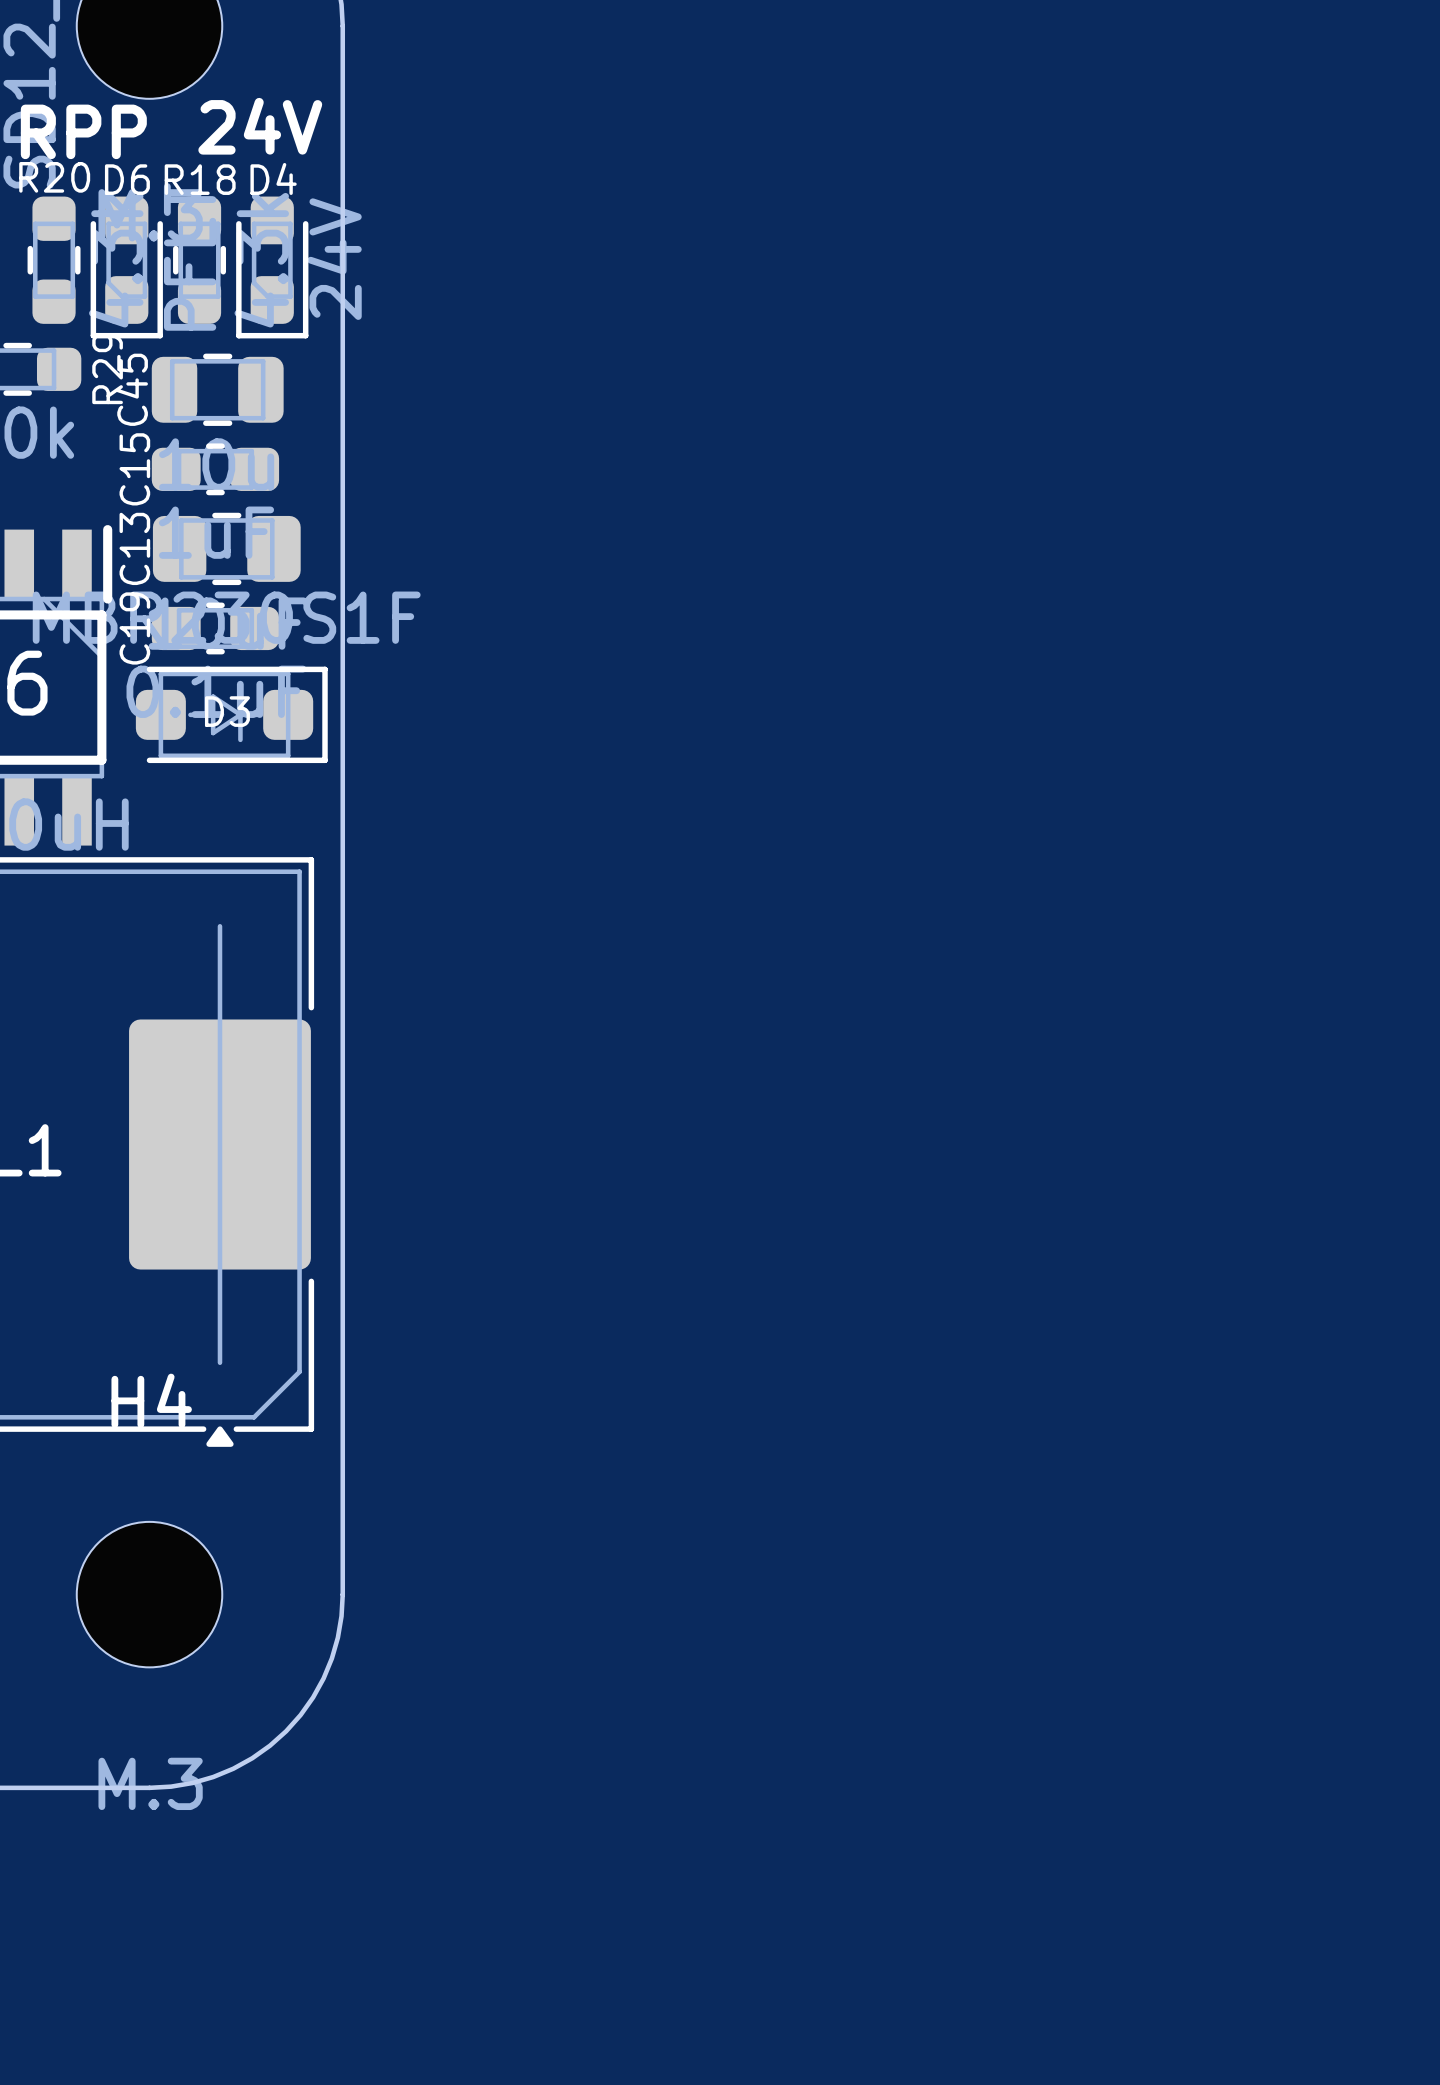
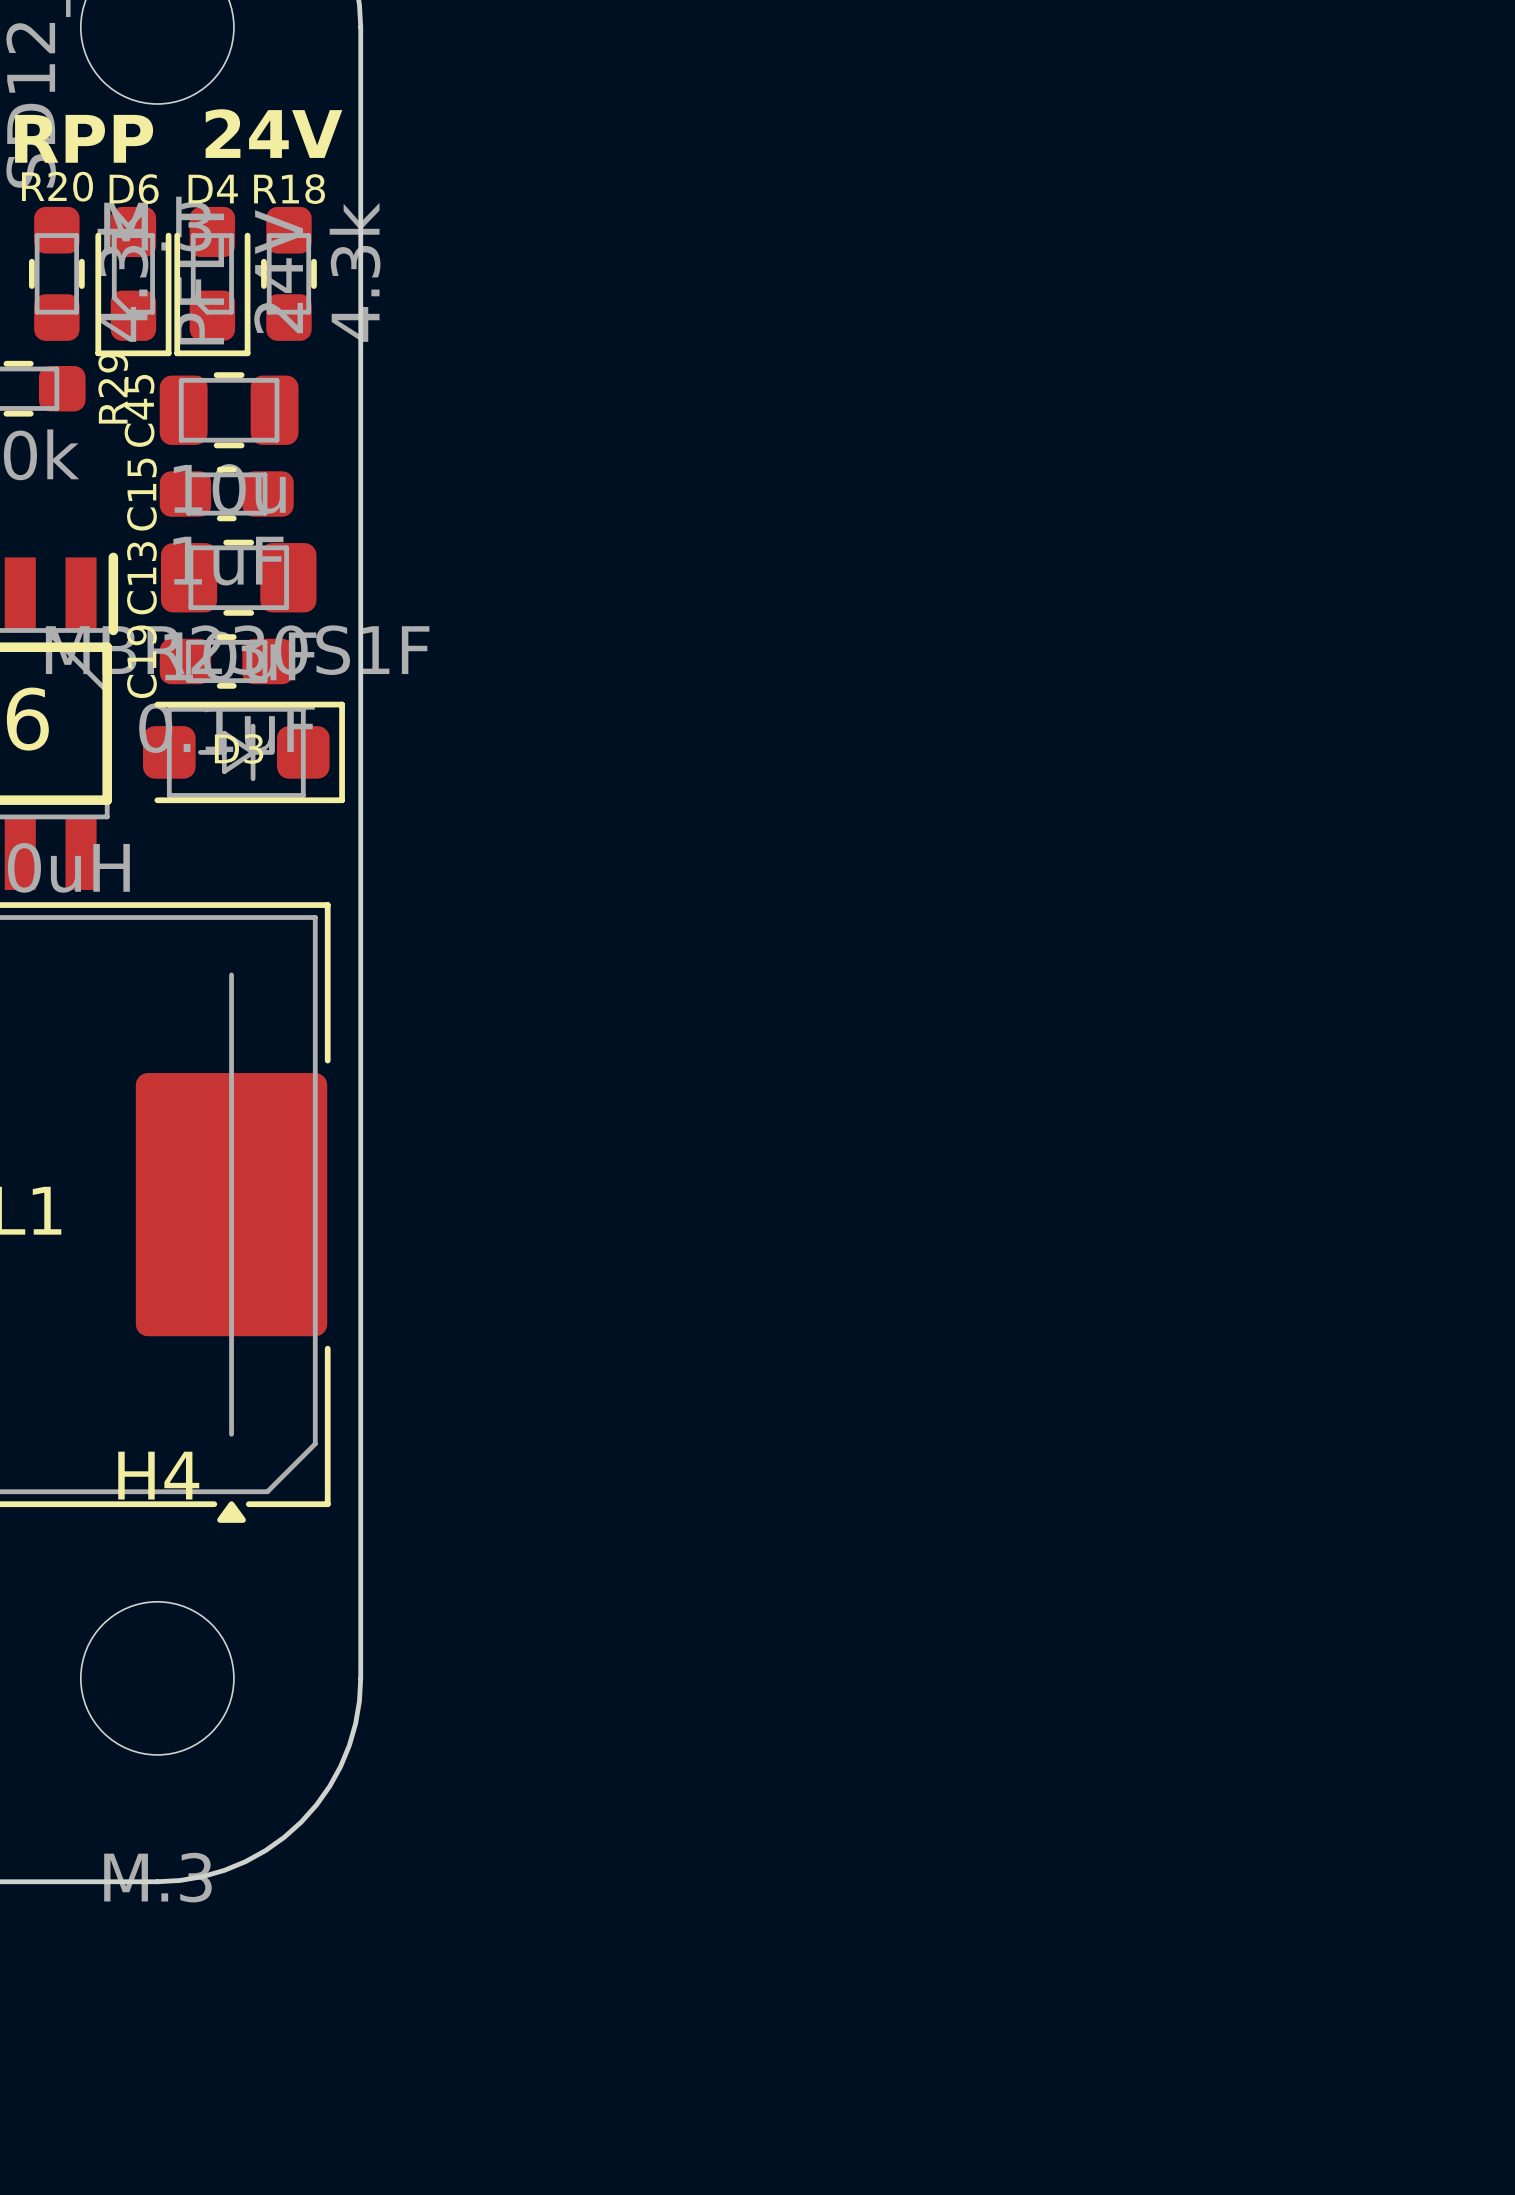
R18 position: (199, 260) -> (288, 273)
D4 position: (272, 267) -> (212, 281)

